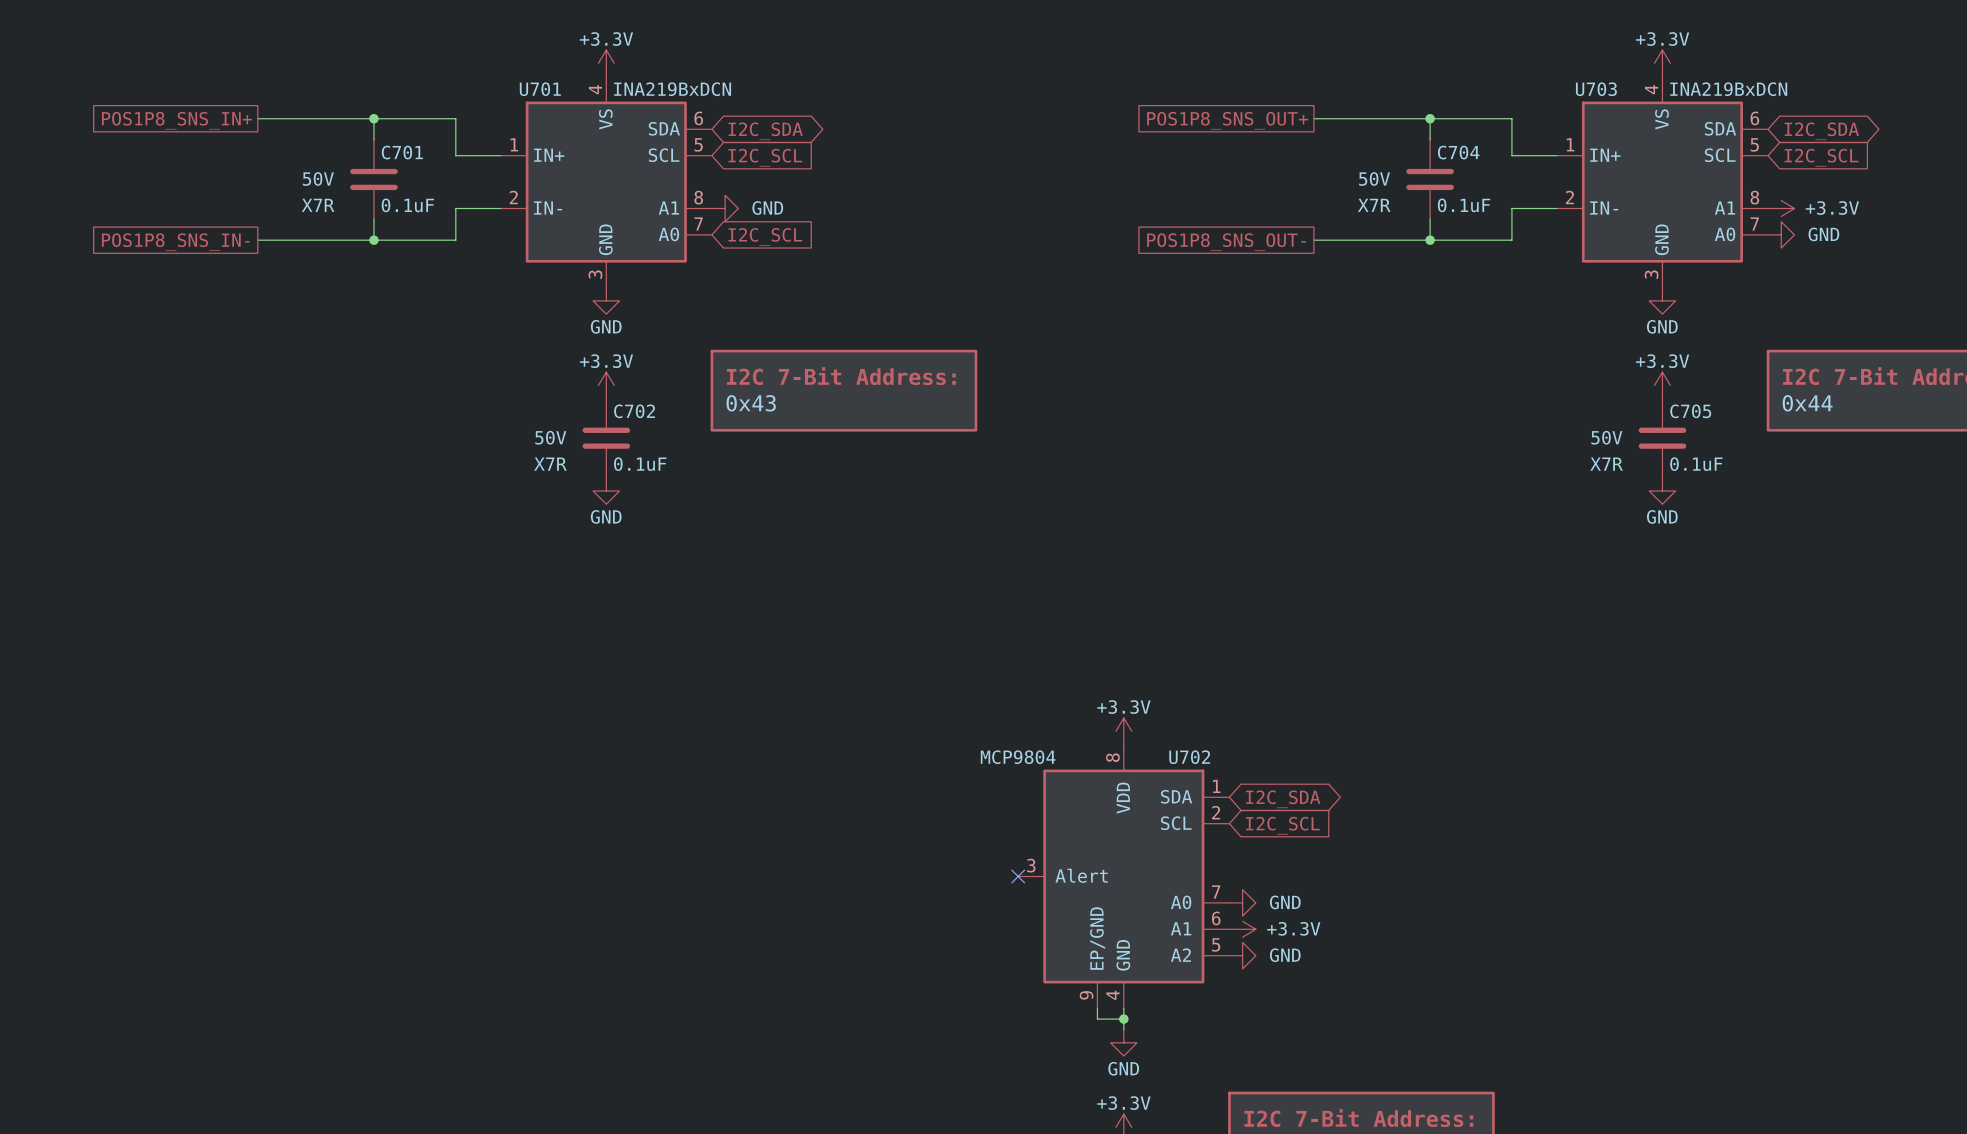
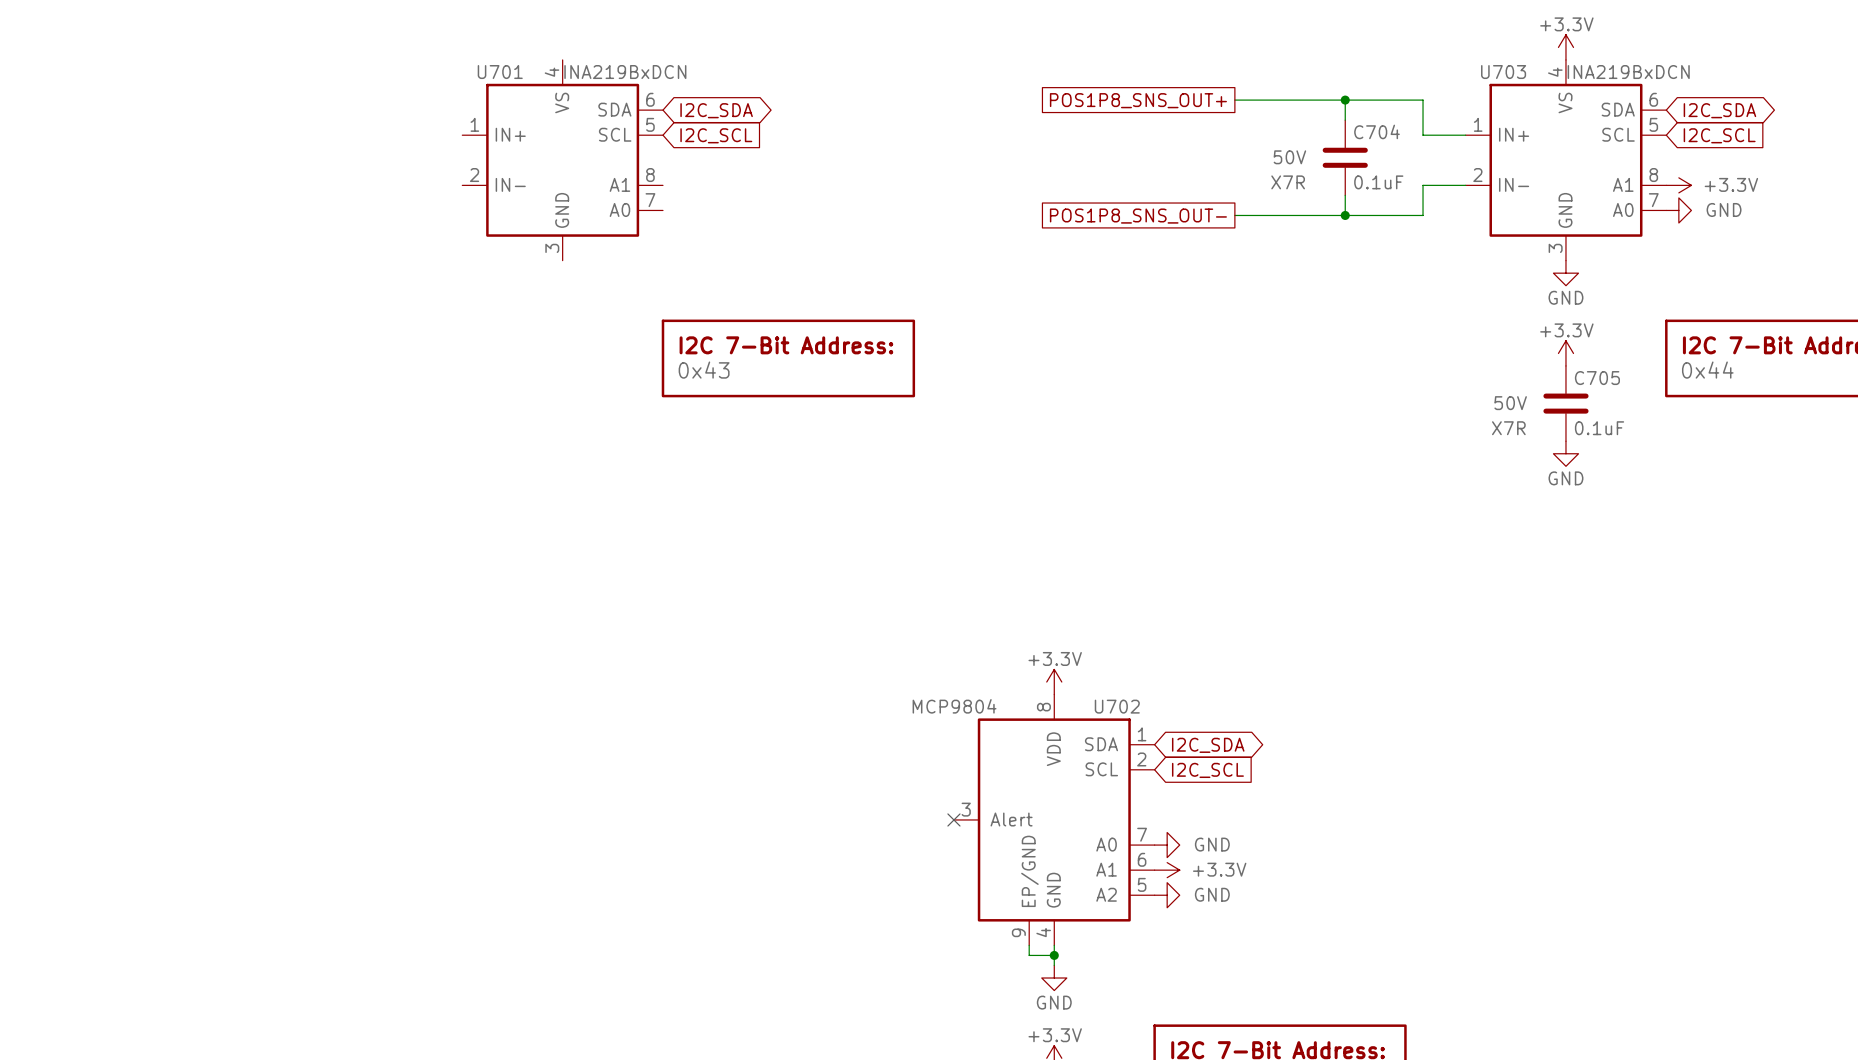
power symbol: +3.3V (606, 63) -> none
wire: (257, 118) (455, 118) (455, 155) (500, 155) -> none
wire: (373, 118) (373, 139) -> none
junction: (373, 118) -> none
global label: POS1P8_SNS_IN+ (177, 120) -> none
C701: 0.1uF (373, 179) -> none
wire: (500, 208) (455, 208) (455, 240) (257, 240) -> none
power symbol: GND (725, 208) -> none
wire: (373, 219) (373, 240) -> none
global label: I2C_SCL (765, 236) -> none
junction: (373, 240) -> none
global label: POS1P8_SNS_IN- (175, 242) -> none
power symbol: GND (606, 300) -> none
power symbol: +3.3V (606, 385) -> none
C702: 0.1uF (606, 438) -> none
power symbol: GND (606, 491) -> none

